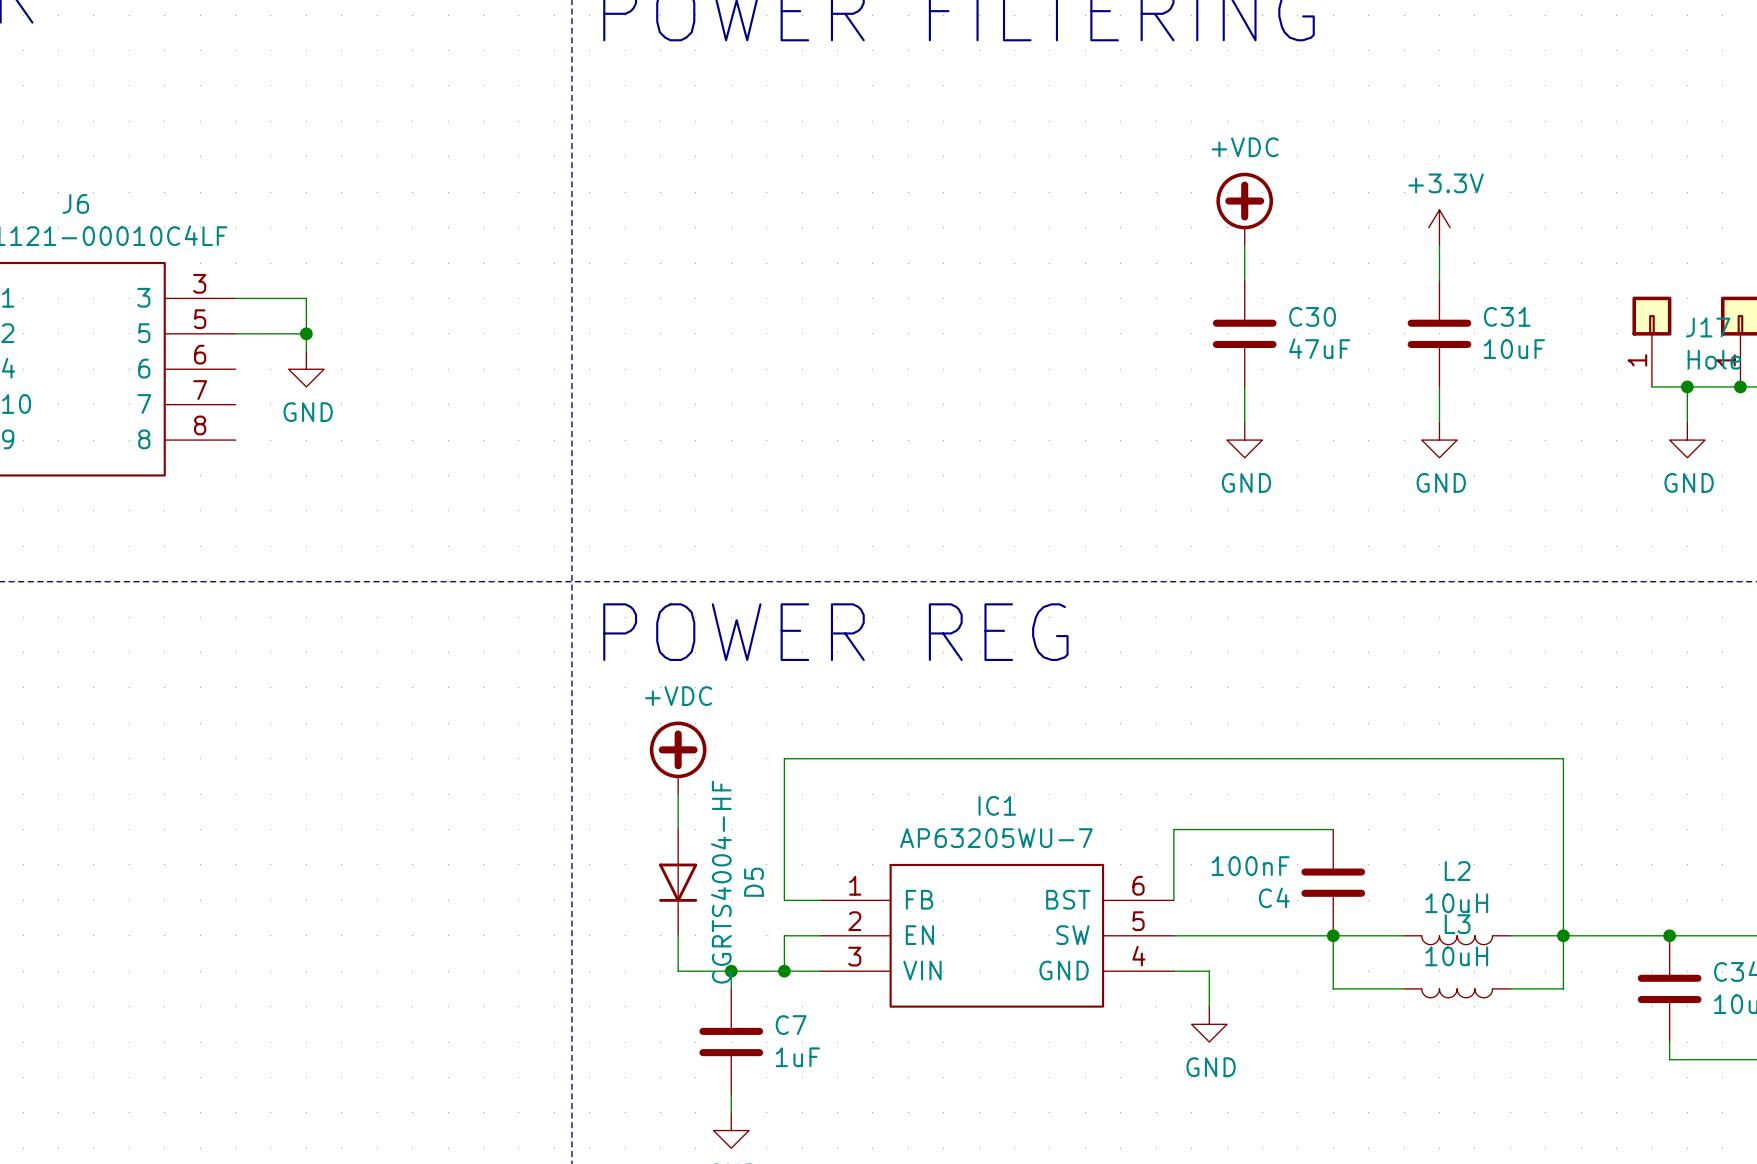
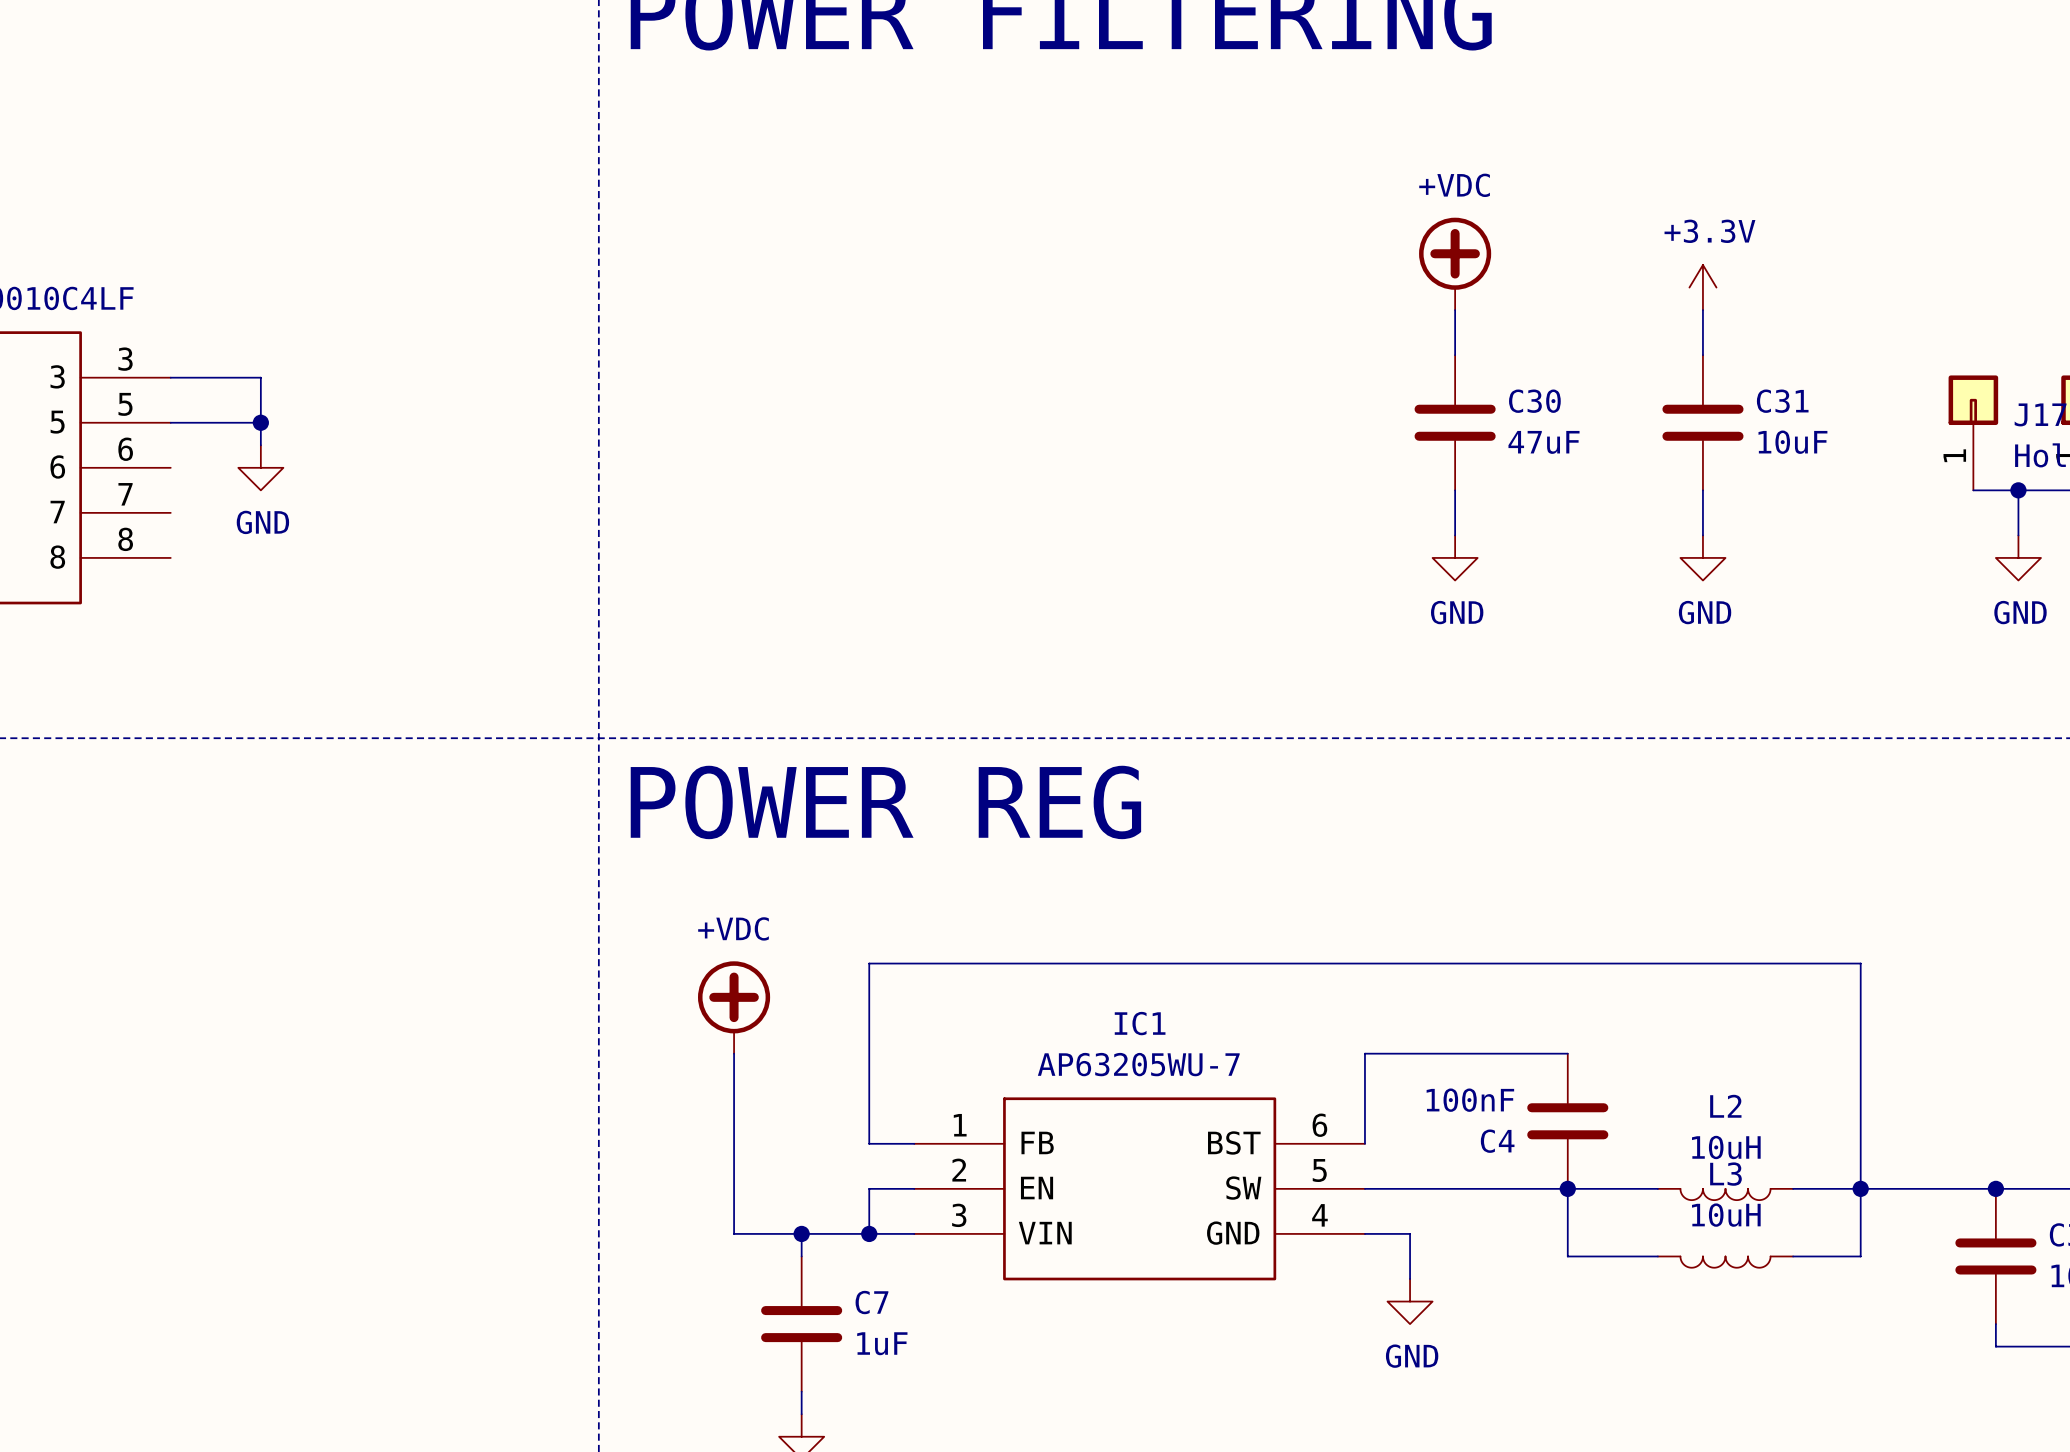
power symbol position: +VDC (678, 757) -> +VDC (734, 1007)
D5: CGRTS4004-HF (678, 882) -> none

